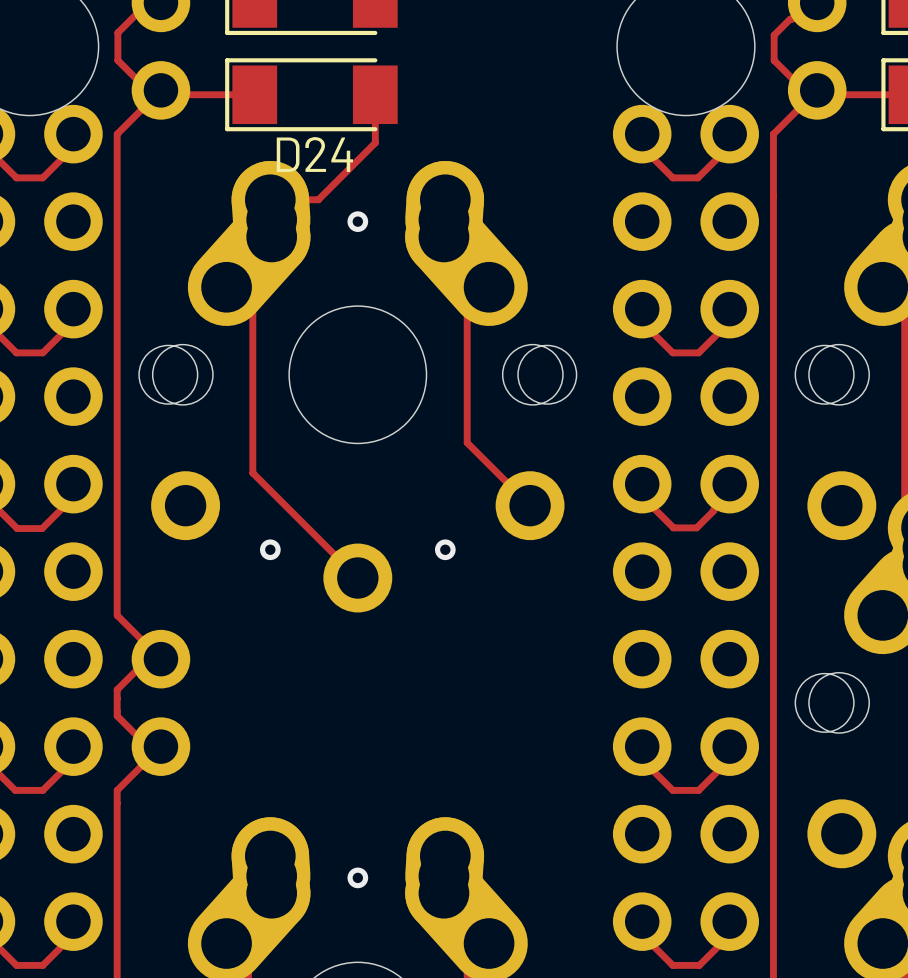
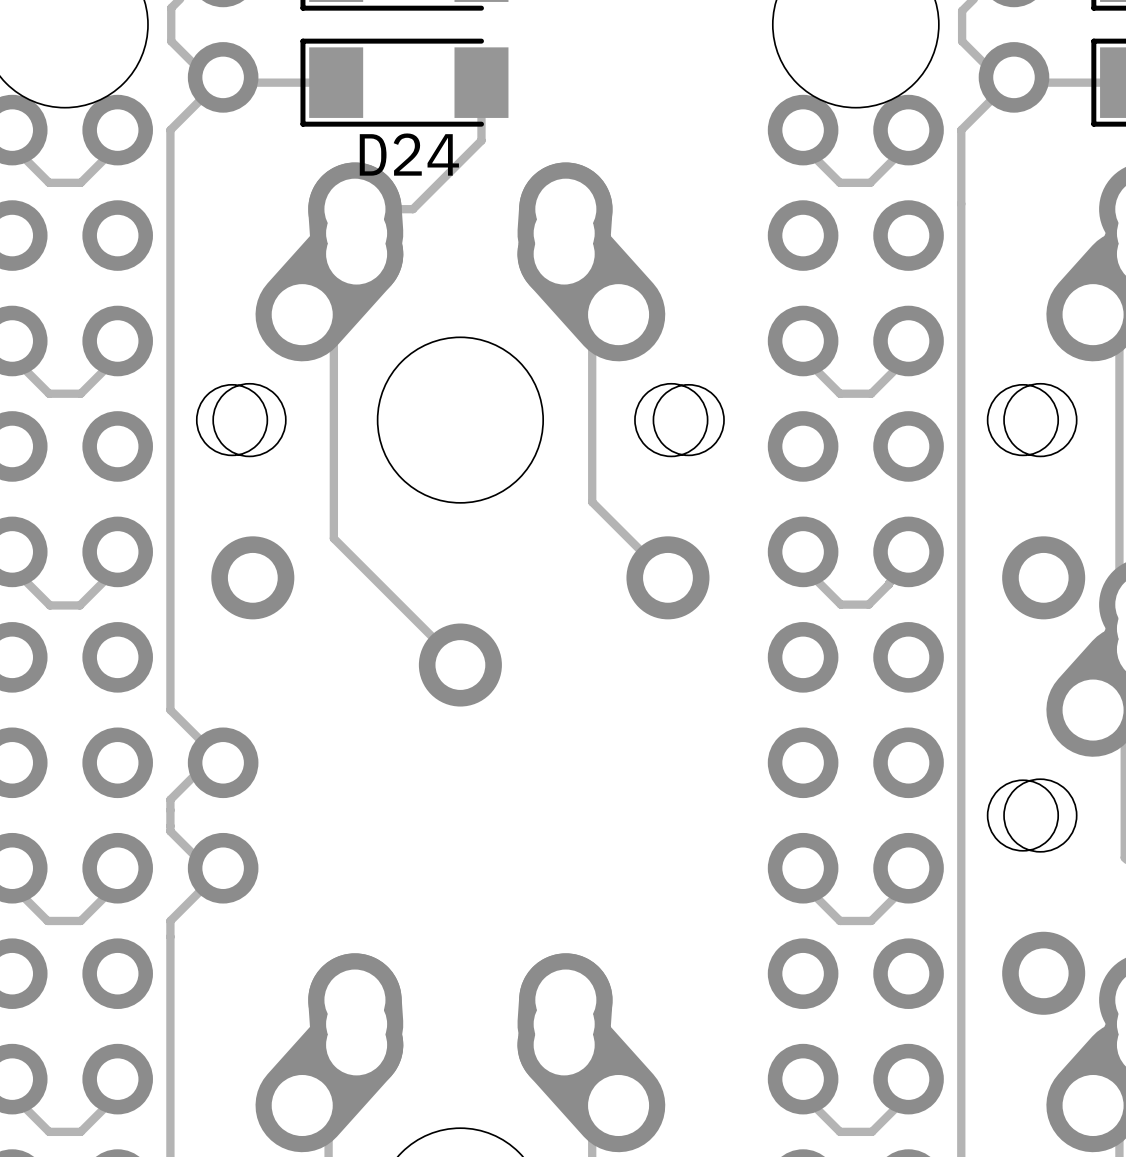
via: (357, 221) -> none
via: (270, 549) -> none
via: (445, 549) -> none
via: (357, 877) -> none

